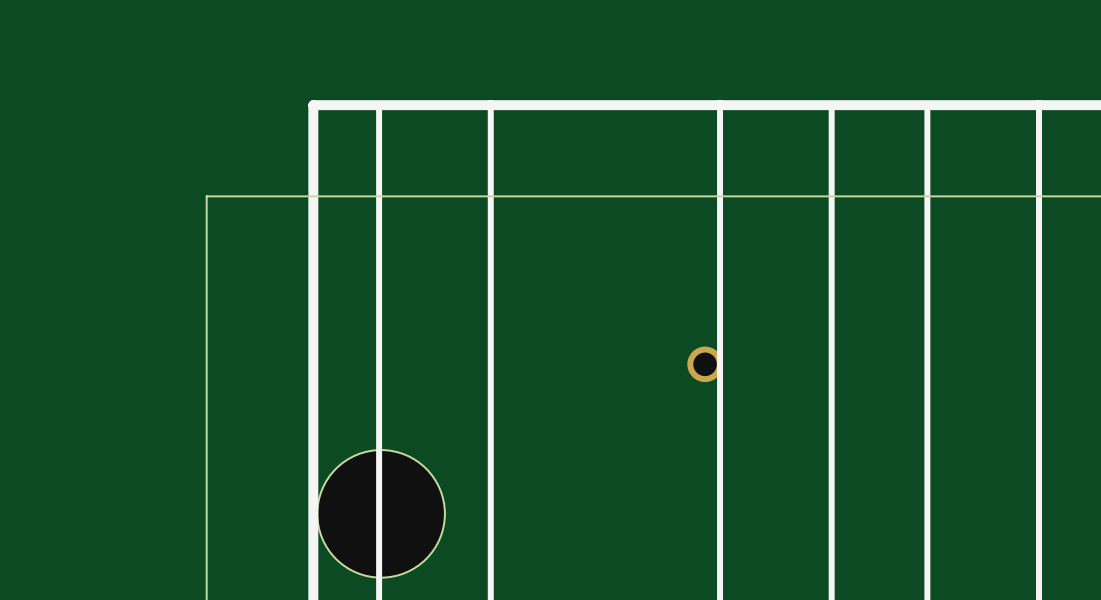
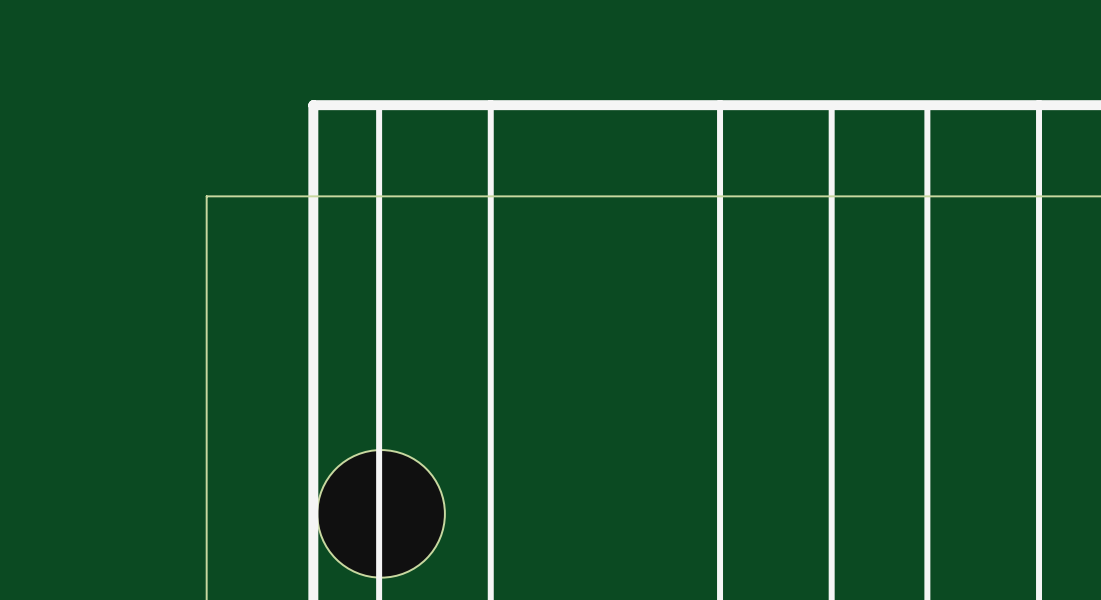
via: (705, 364) -> none

